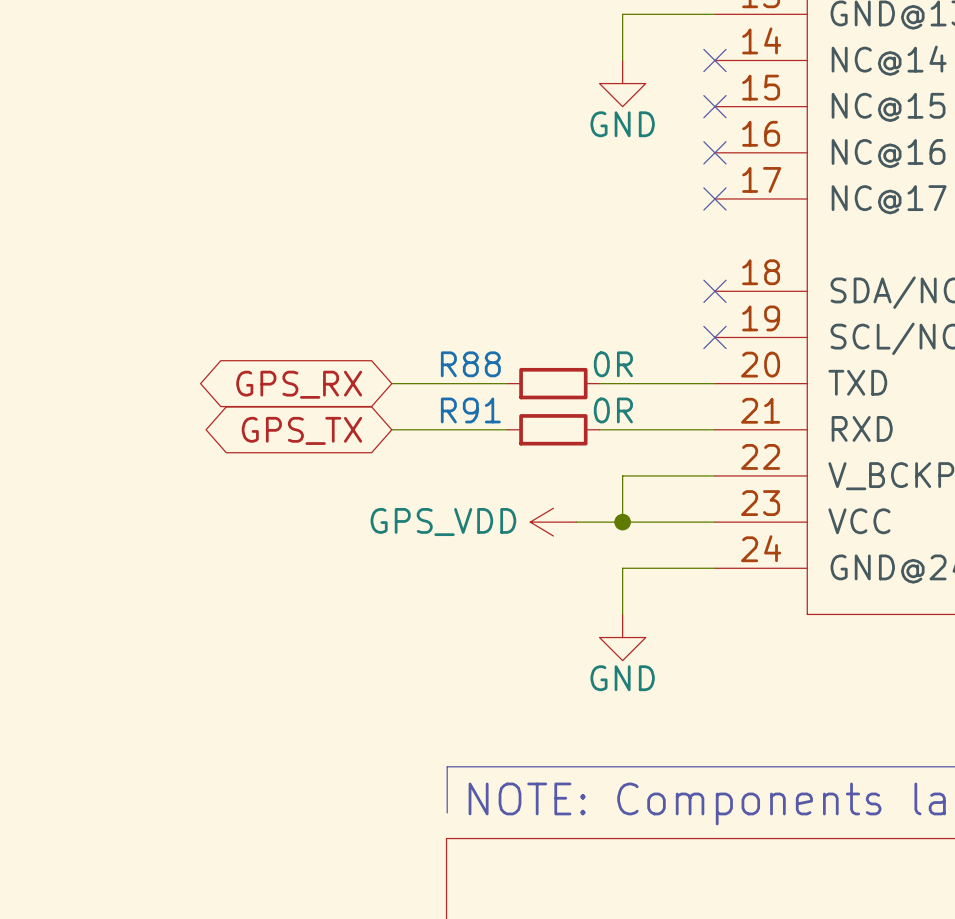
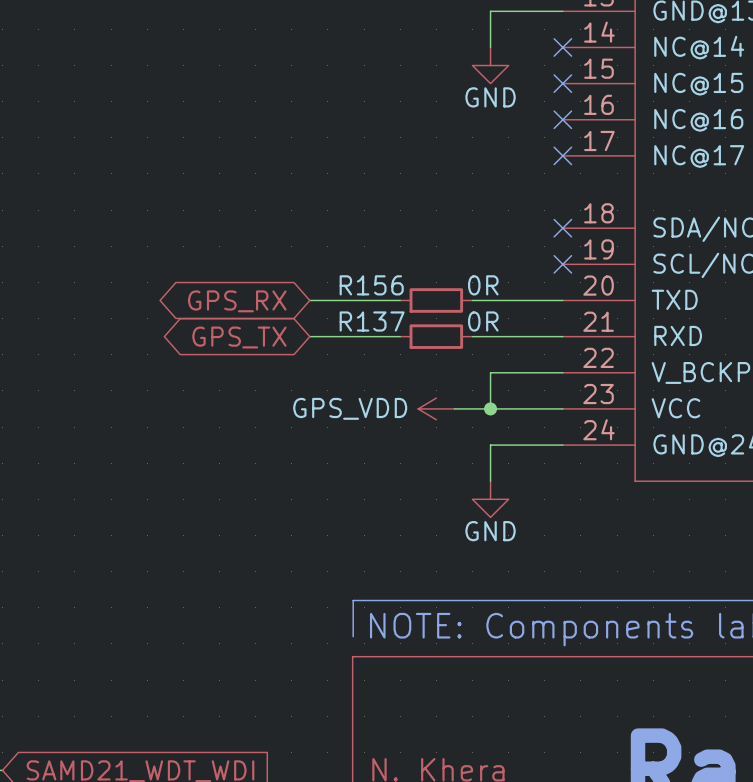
R88 name: R88 (470, 364) -> R156 (371, 285)
R91 name: R91 (470, 410) -> R137 (372, 321)

